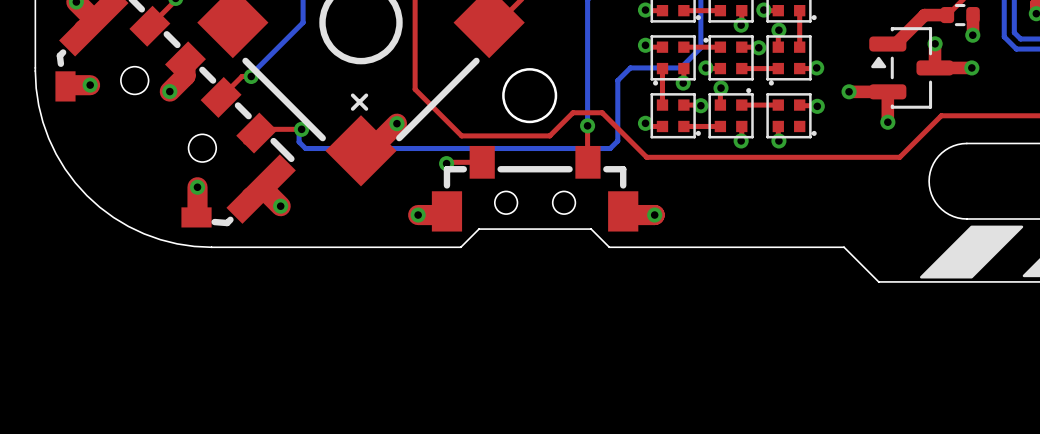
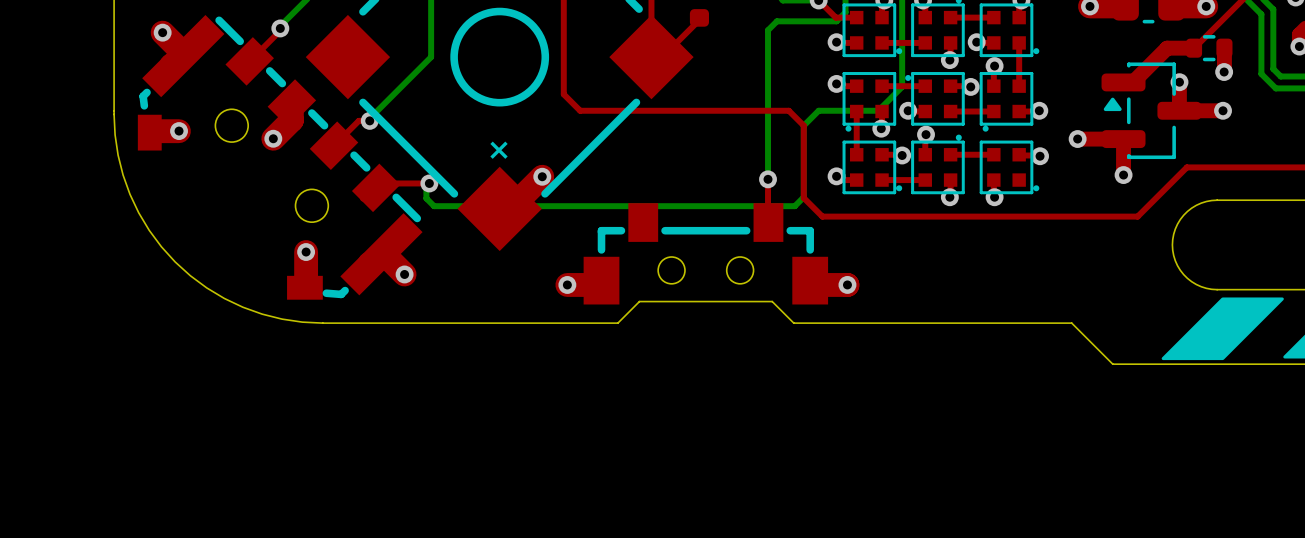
top track: (415, 54) (415, 89) (461, 135) (549, 135) (572, 112) (602, 112) (646, 157) -> (563, 94) (580, 110) (788, 110) (803, 125) (803, 197) (822, 216) (838, 216)
round board edge: [502, 68, 558, 124] -> none
top track: (482, 162) (446, 163) -> none
via: (446, 163) -> none

